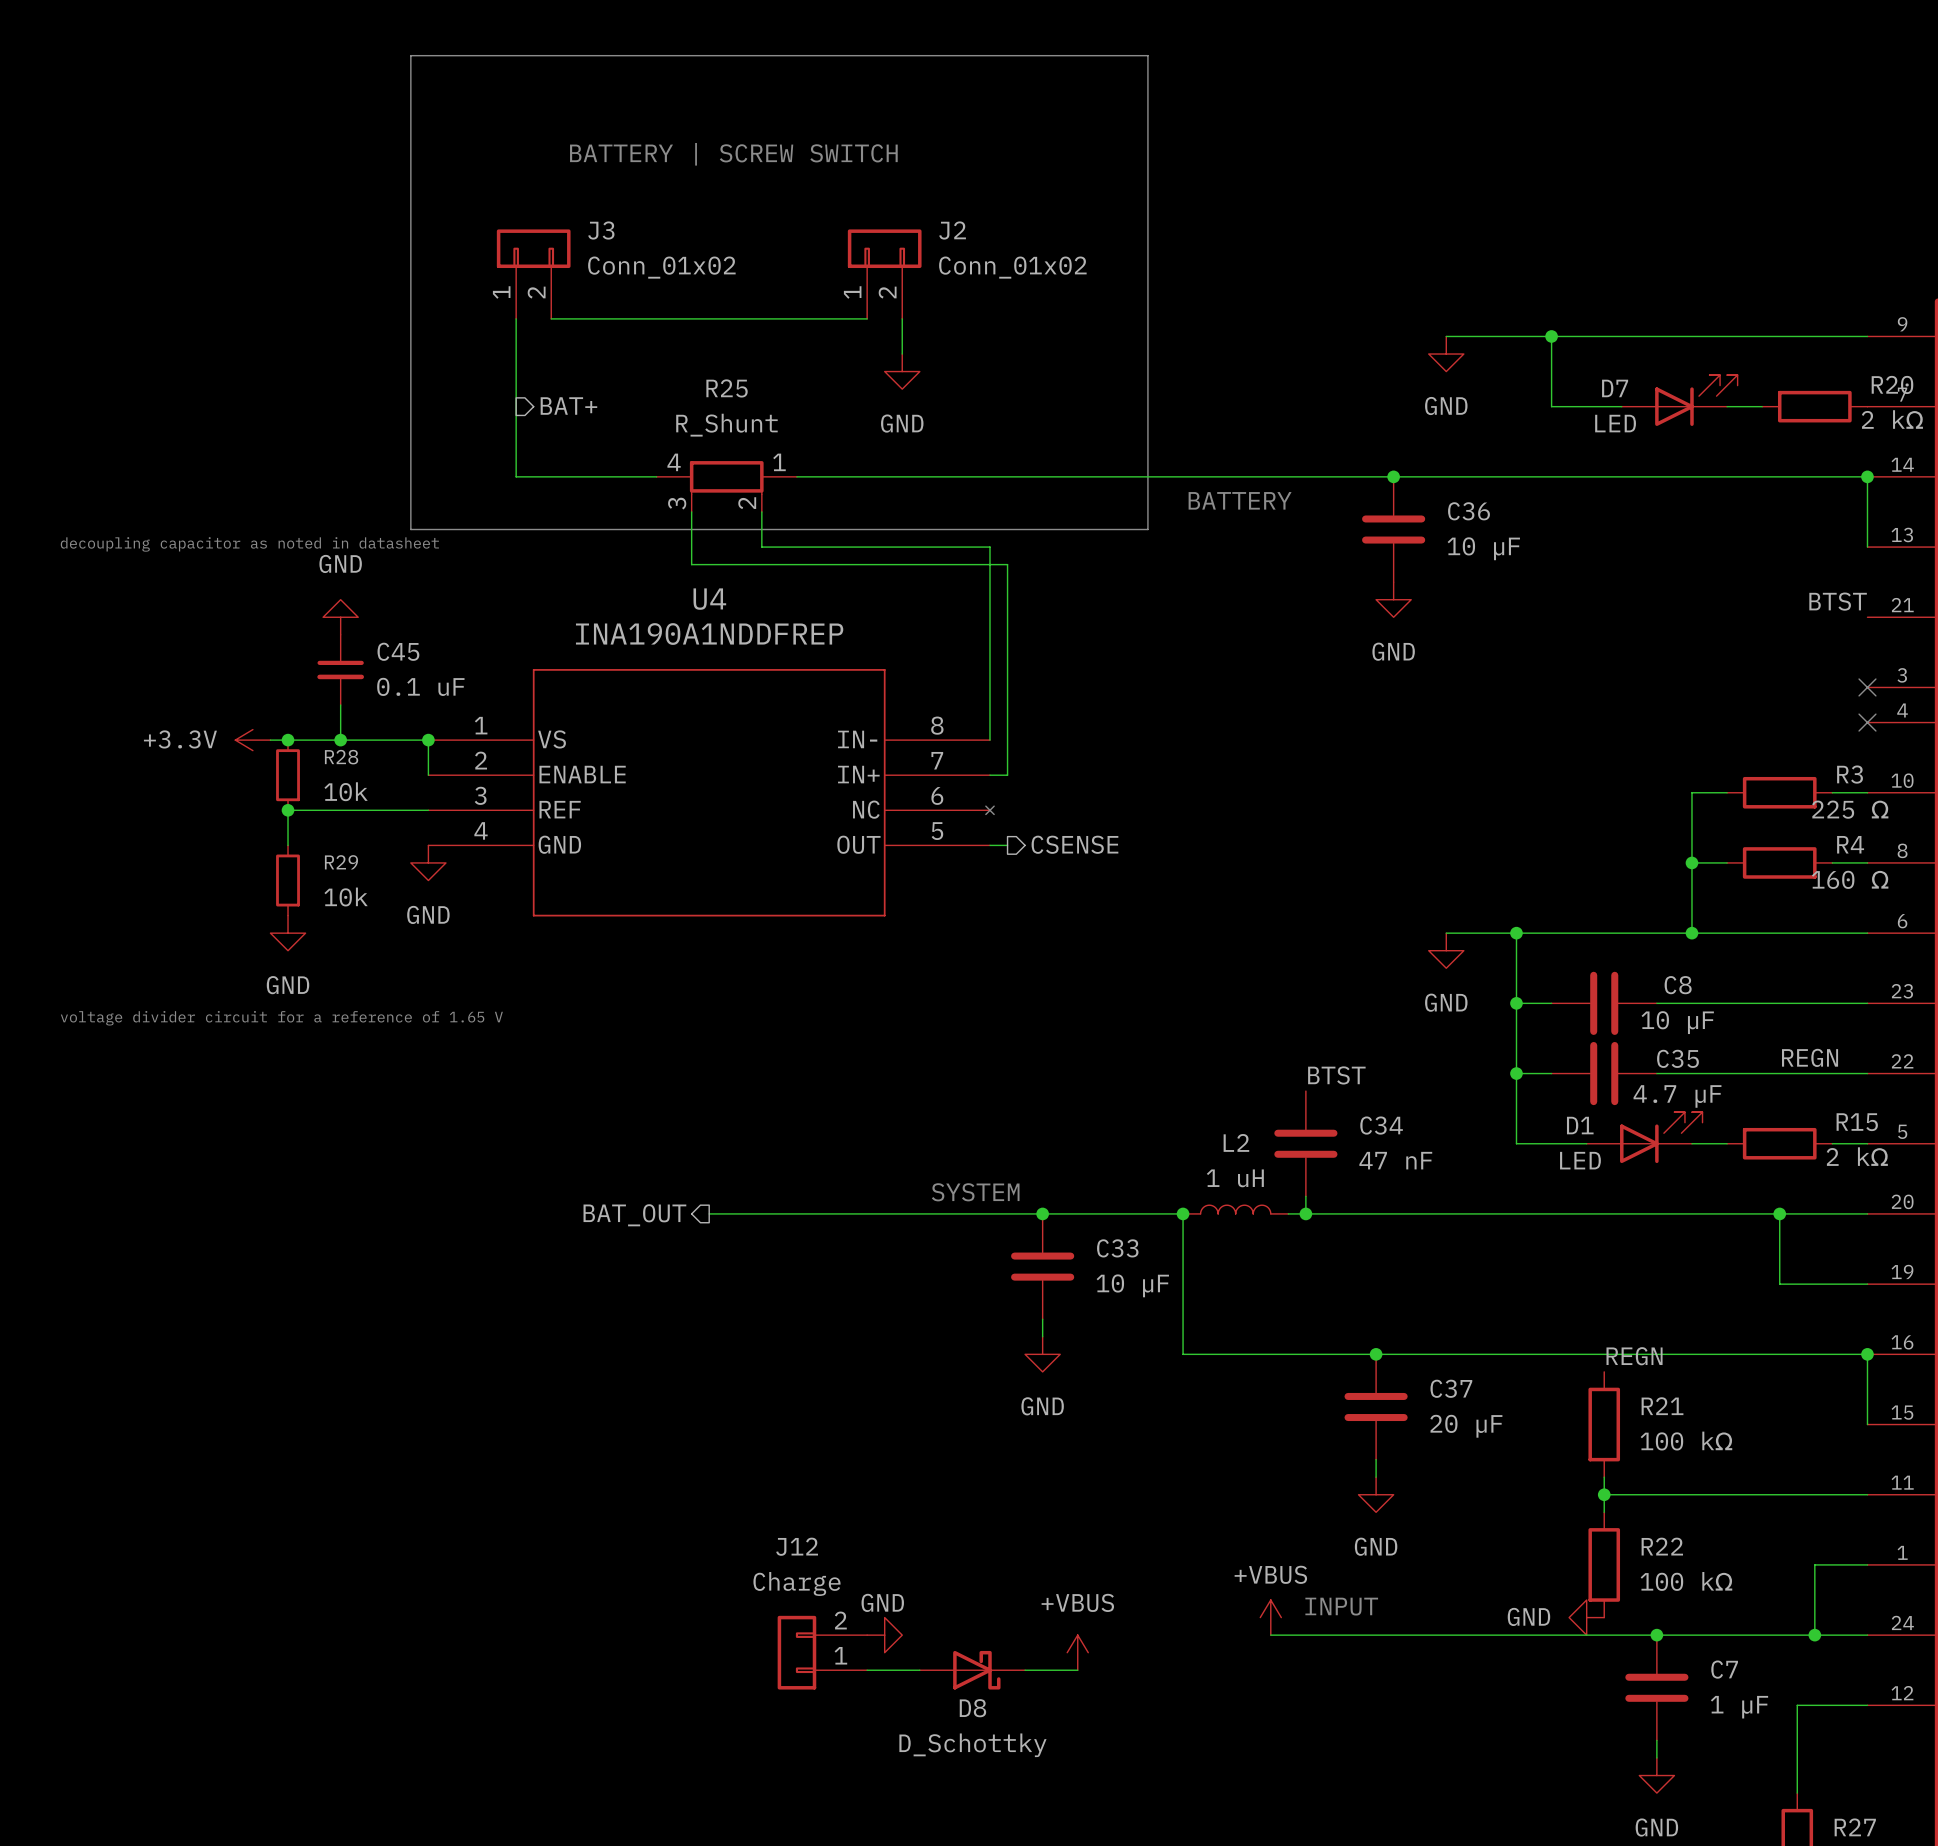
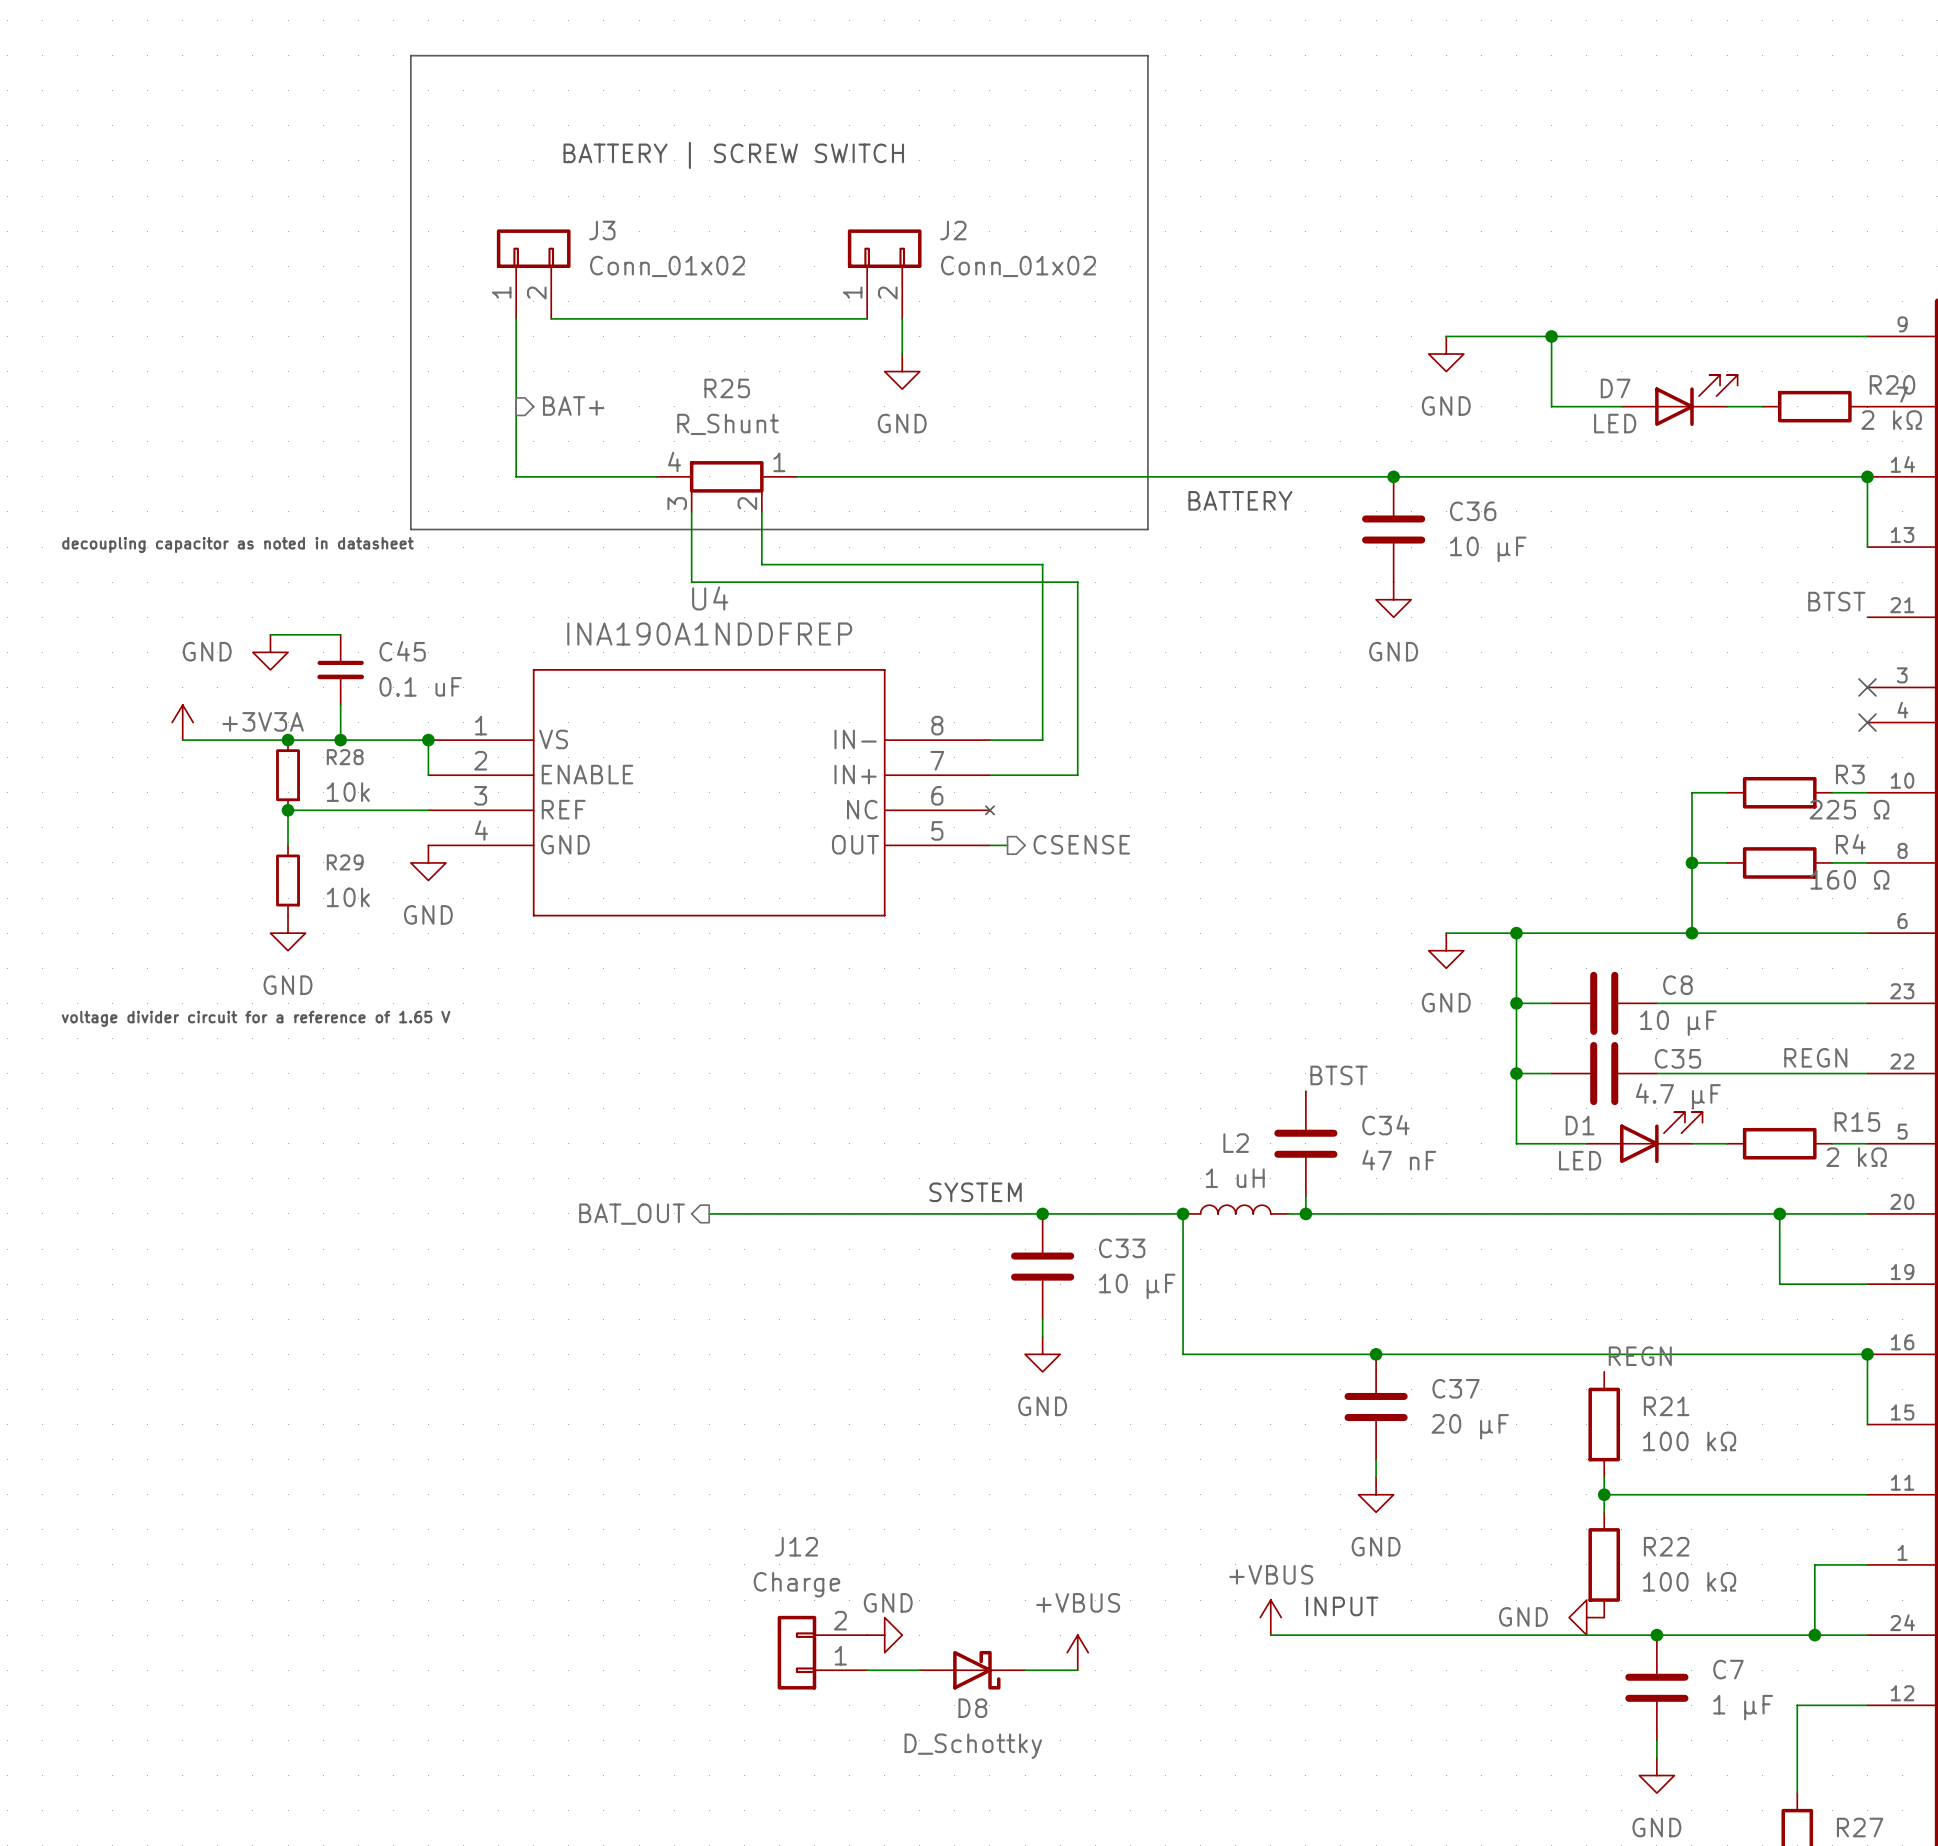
wire: (761, 547) (989, 547) (989, 740) -> none
power symbol text position: GND (340, 563) -> GND (207, 651)
wire: (691, 564) (761, 564) -> (761, 547) (761, 564)
wire: none -> (691, 564) (691, 582) (1077, 582) (1077, 775) (1007, 775)
wire: (1007, 564) (1007, 775) -> (1007, 564) (1042, 564) (1042, 740) (989, 740)
power symbol rotation: 0° (340, 617) -> 180° (270, 652)
power symbol position: GND (340, 617) -> GND (270, 652)
wire: none -> (270, 634) (340, 634)
power symbol: none -> +3V3A (182, 722)
wire: none -> (182, 740) (270, 740)
power symbol: +3.3V (252, 740) -> none

